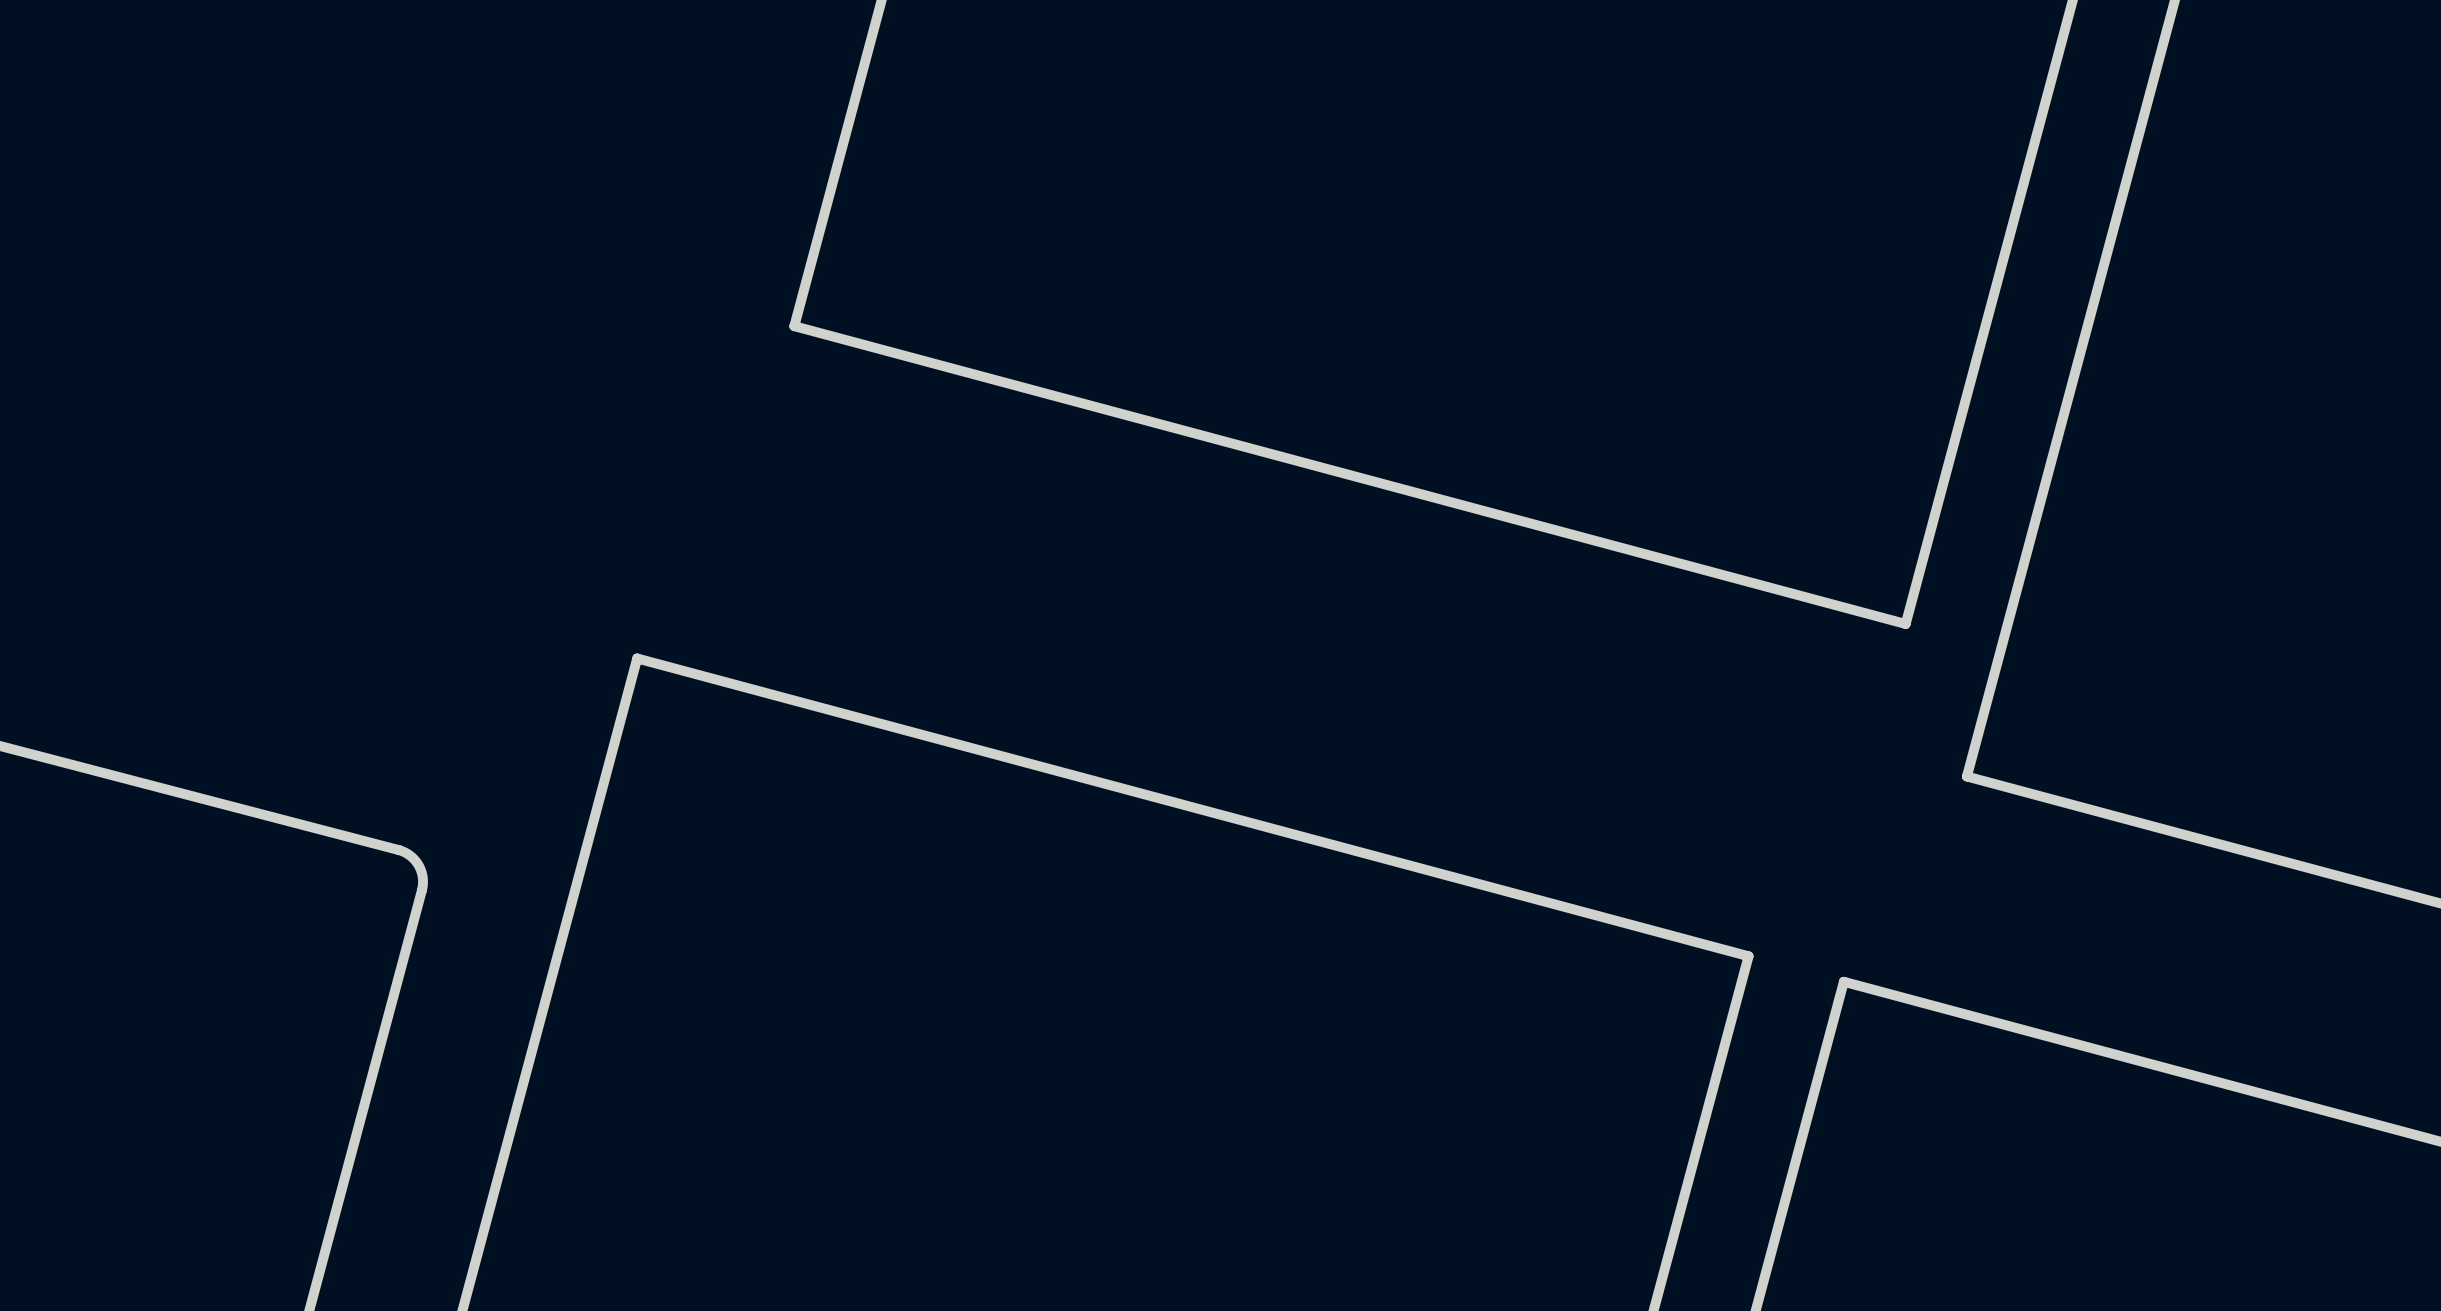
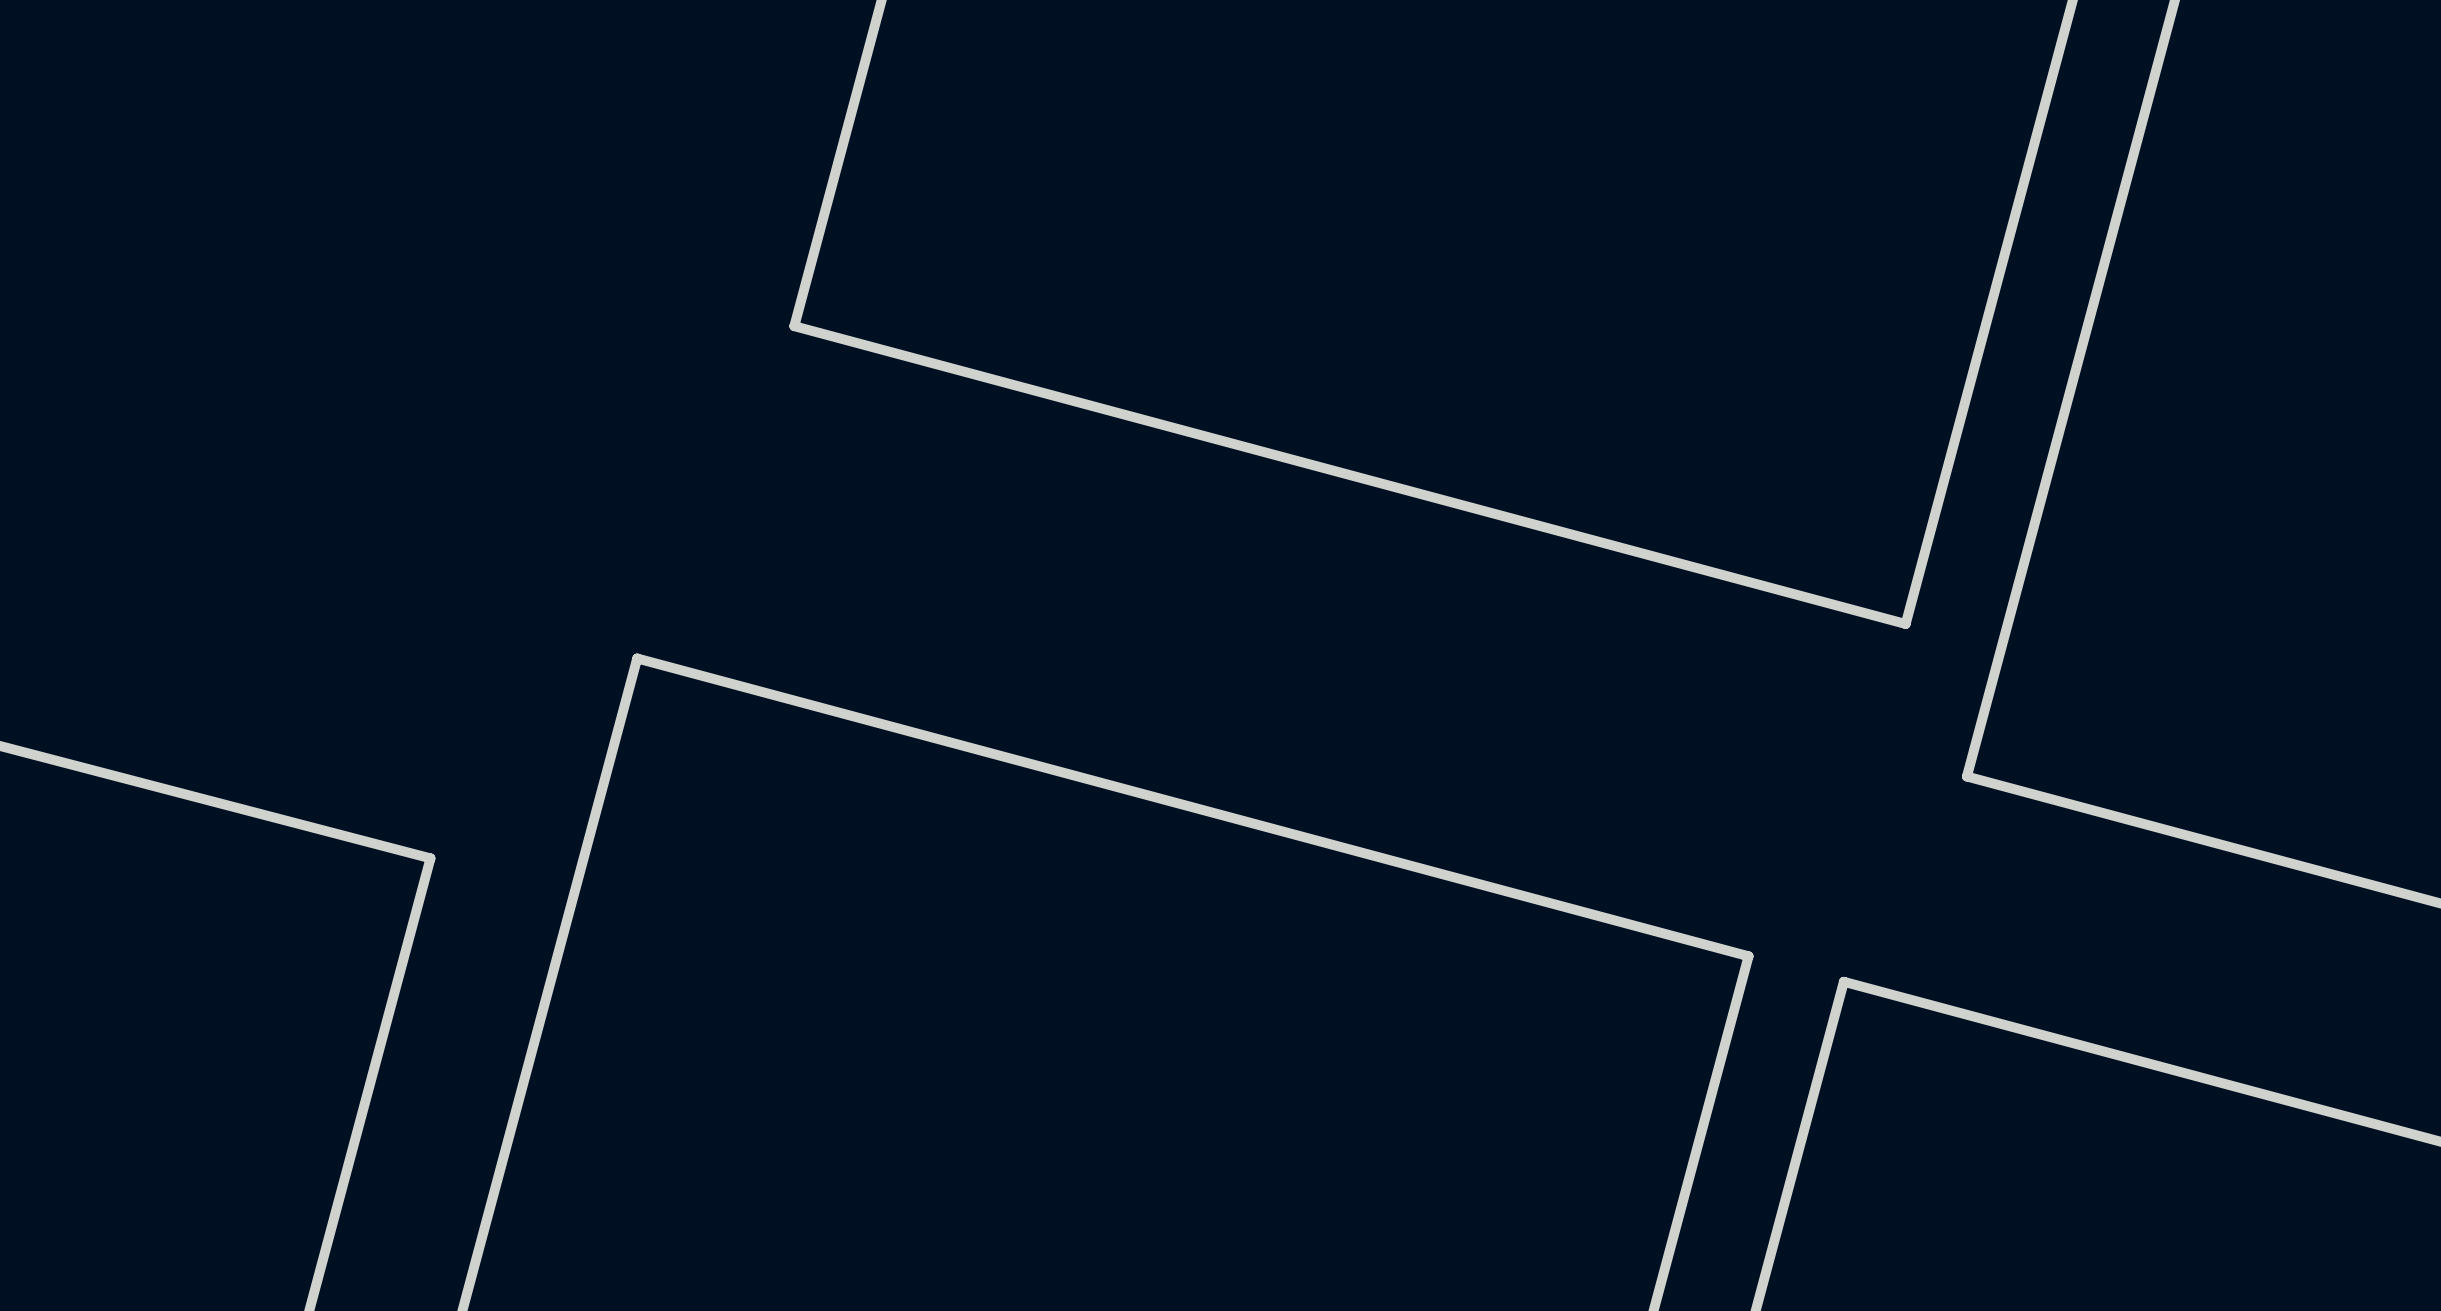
board edge: (398, 849) (411, 856) (418, 865) (422, 879) (421, 890) -> (398, 849) (430, 858) (421, 890)

